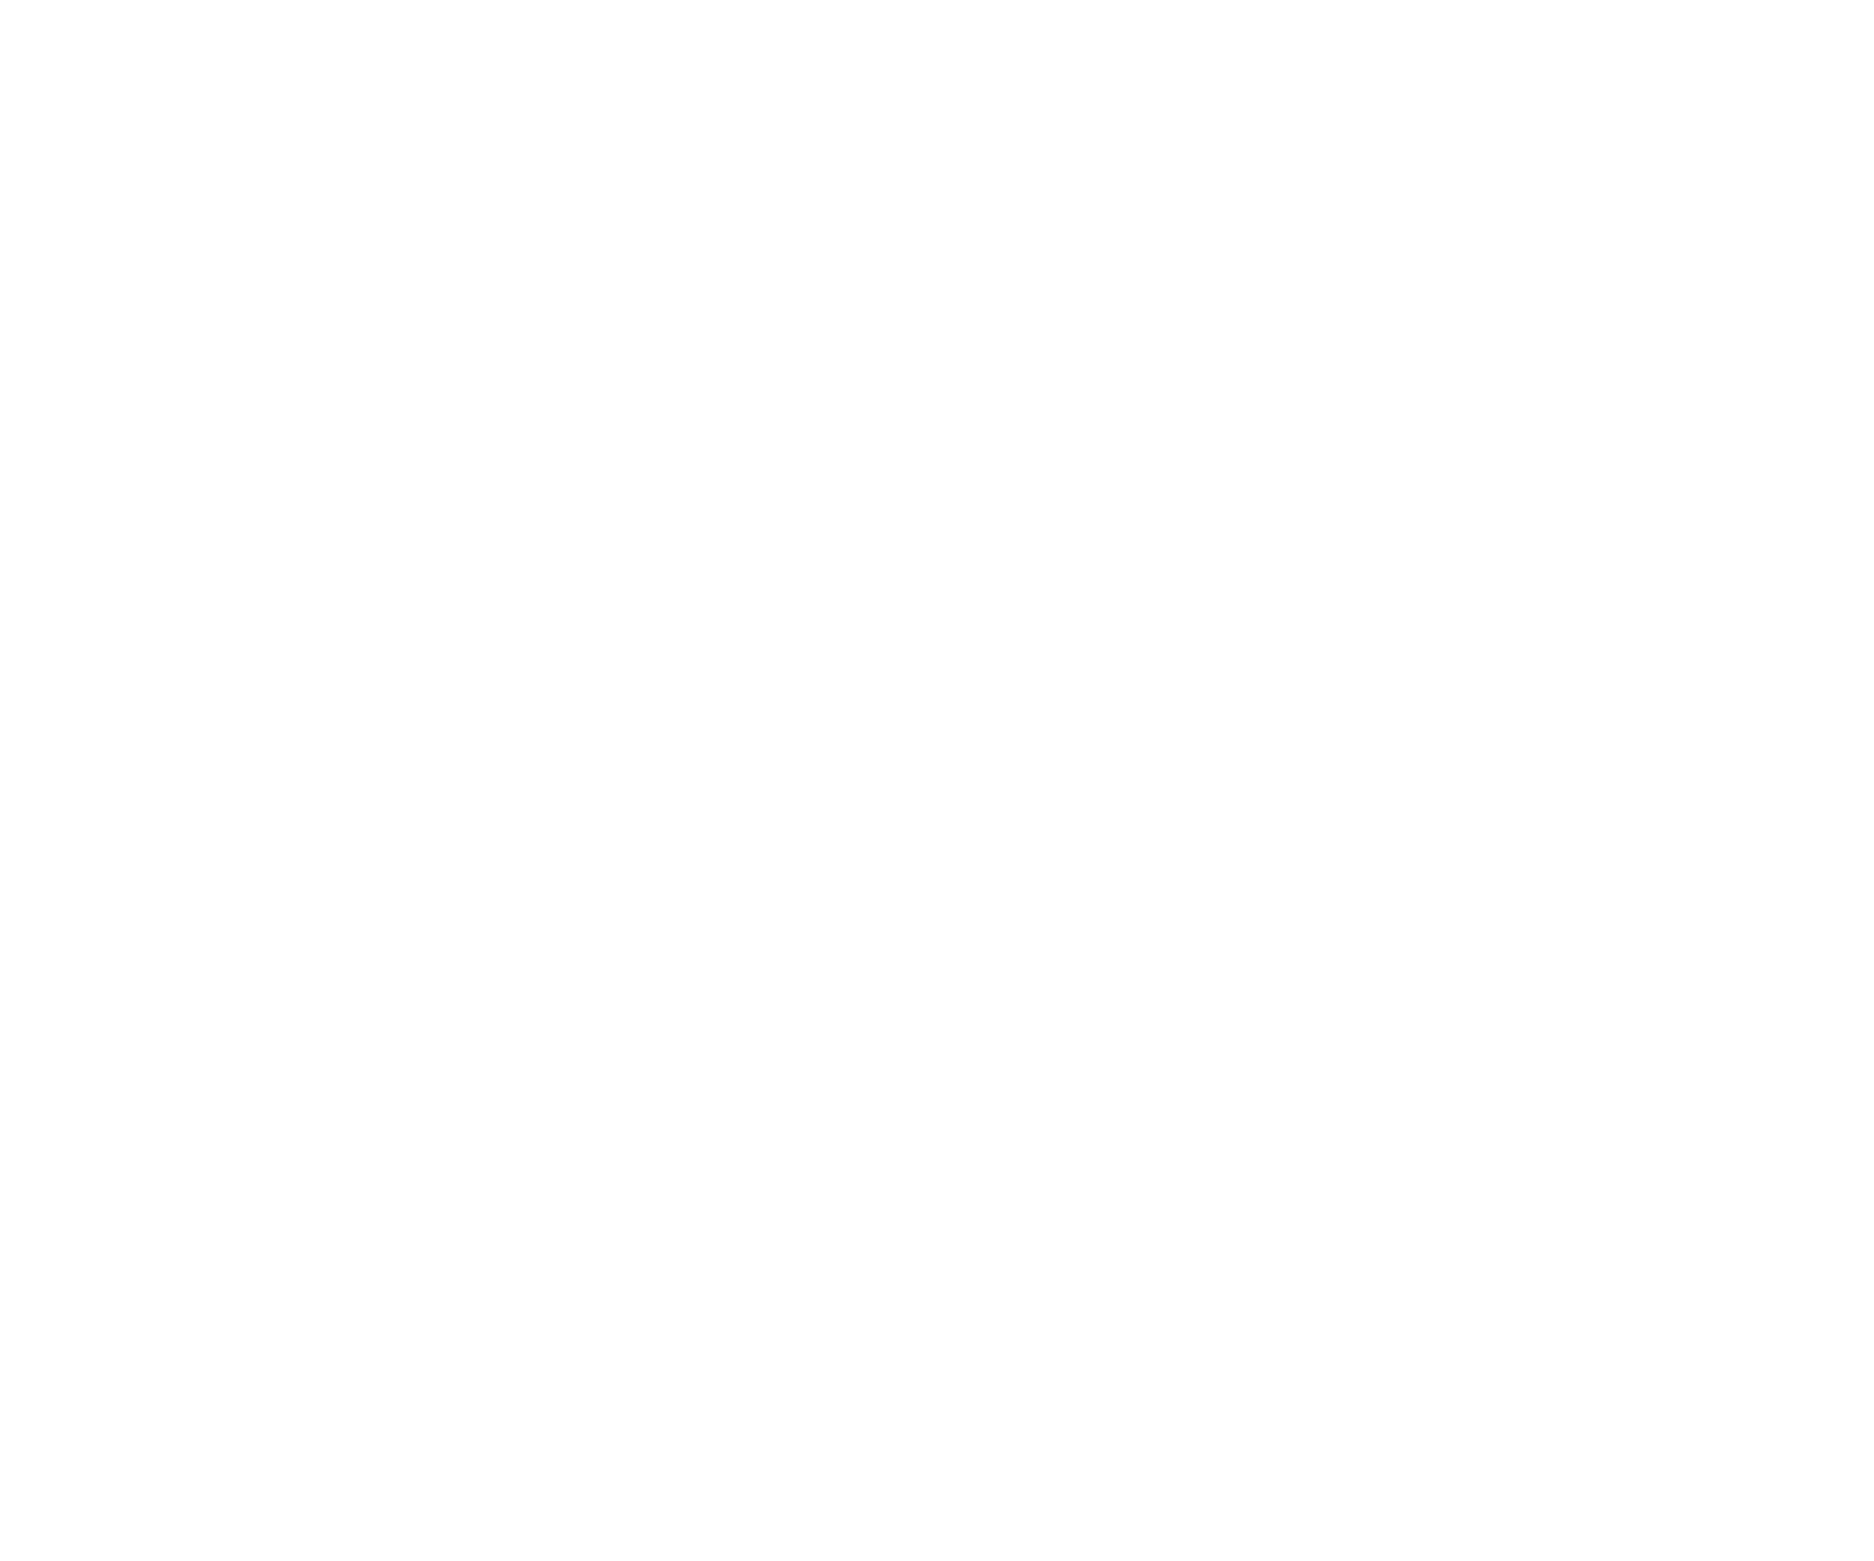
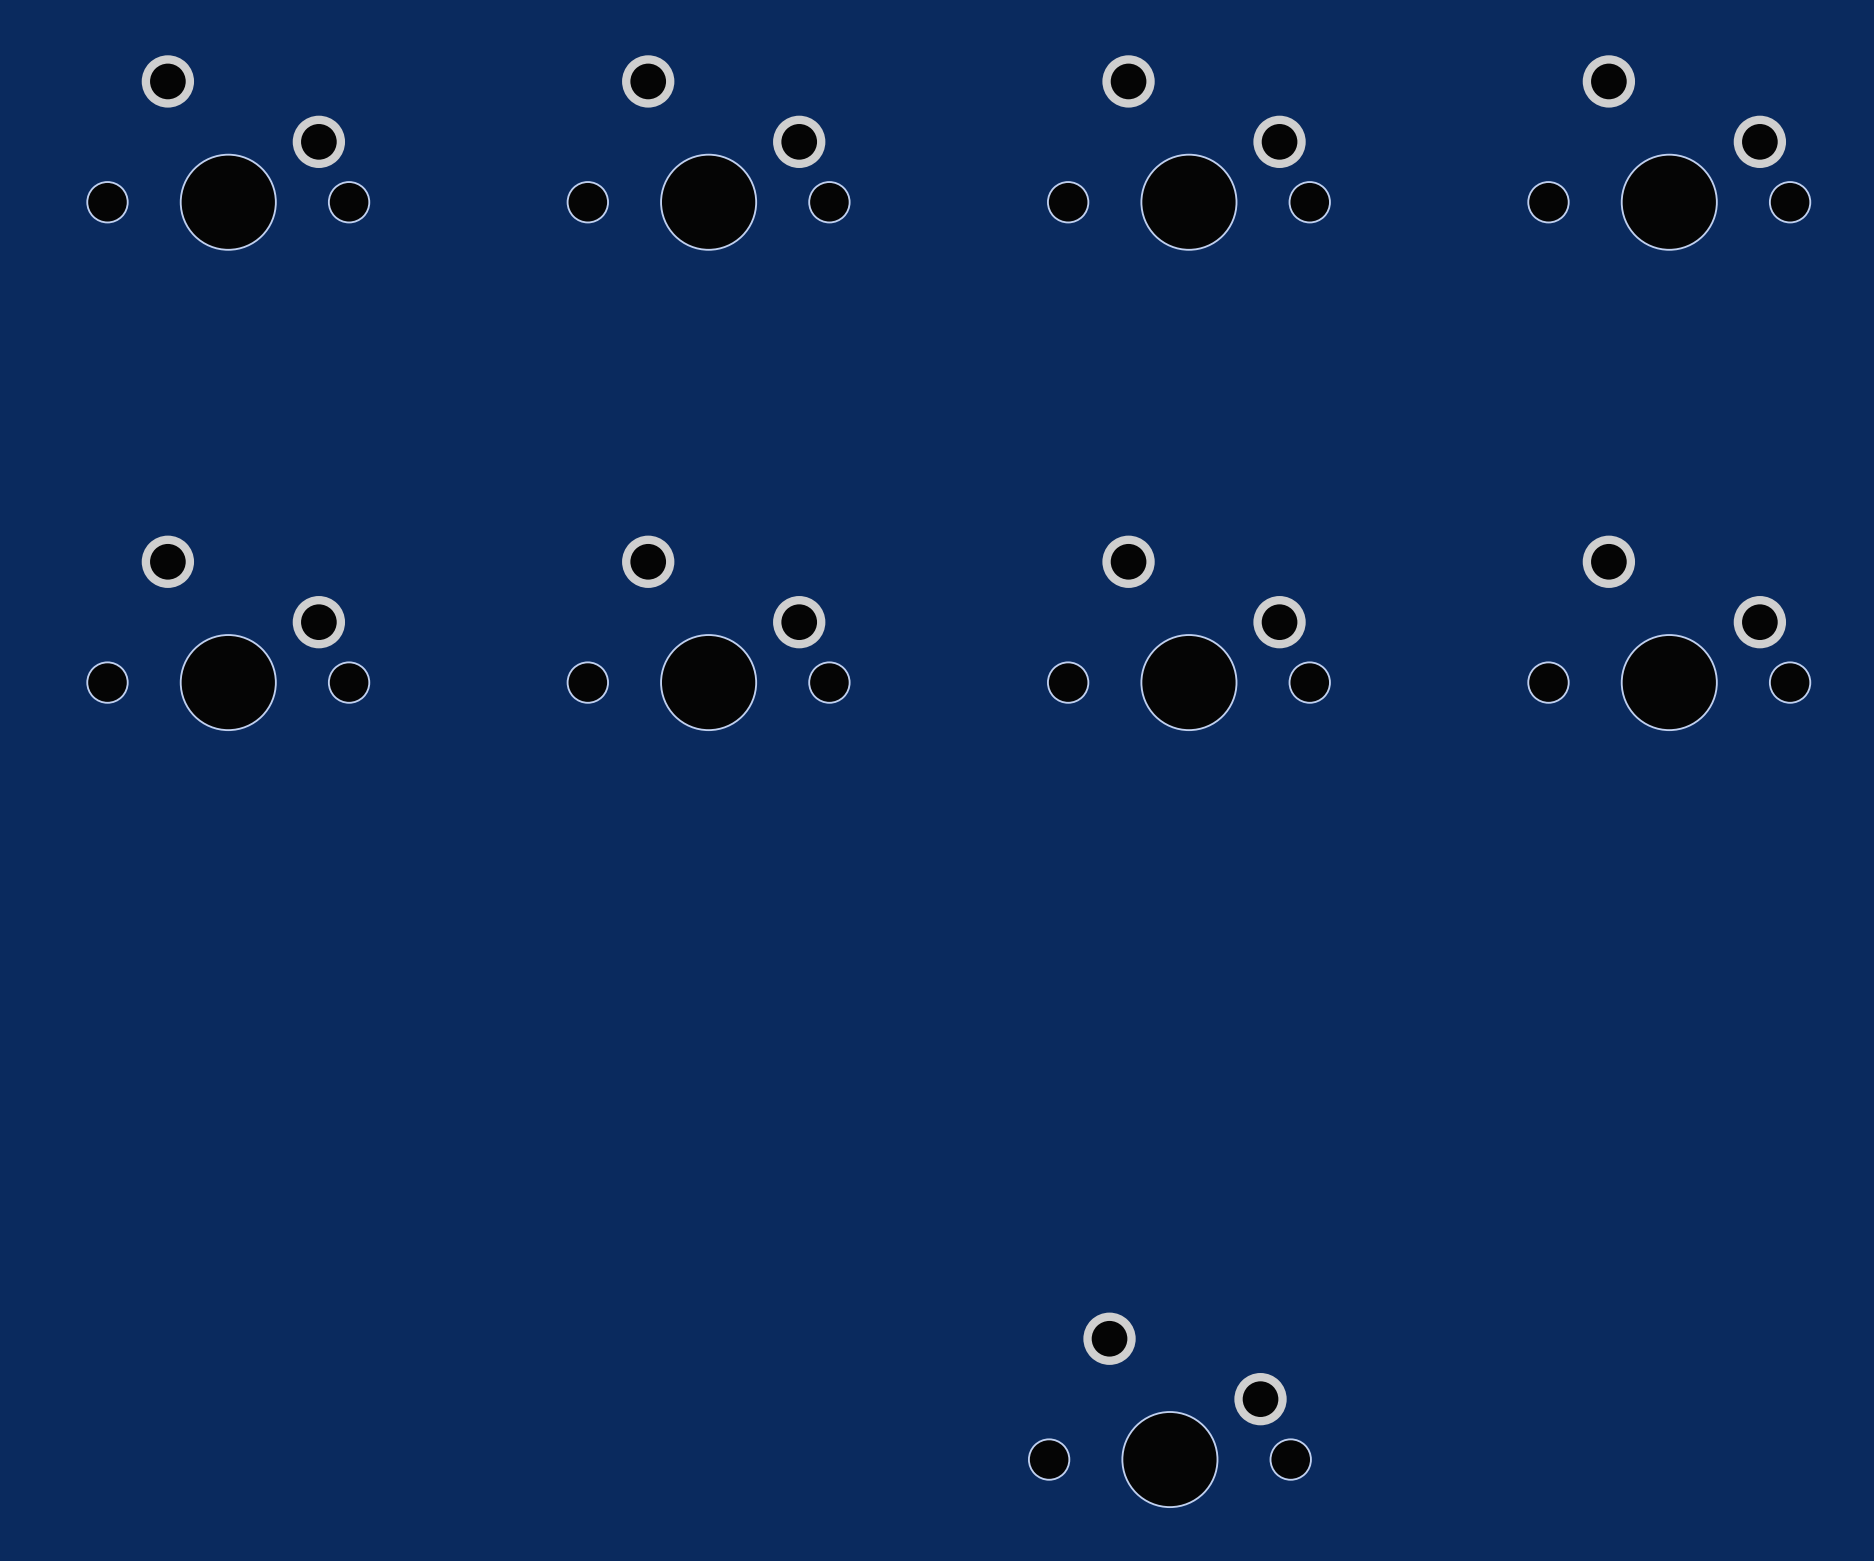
part: none -> (228, 152)
part: none -> (708, 152)
part: none -> (1188, 152)
part: none -> (1669, 152)
part: none -> (228, 632)
part: none -> (708, 632)
part: none -> (1188, 632)
part: none -> (1669, 632)
part: none -> (1169, 1409)

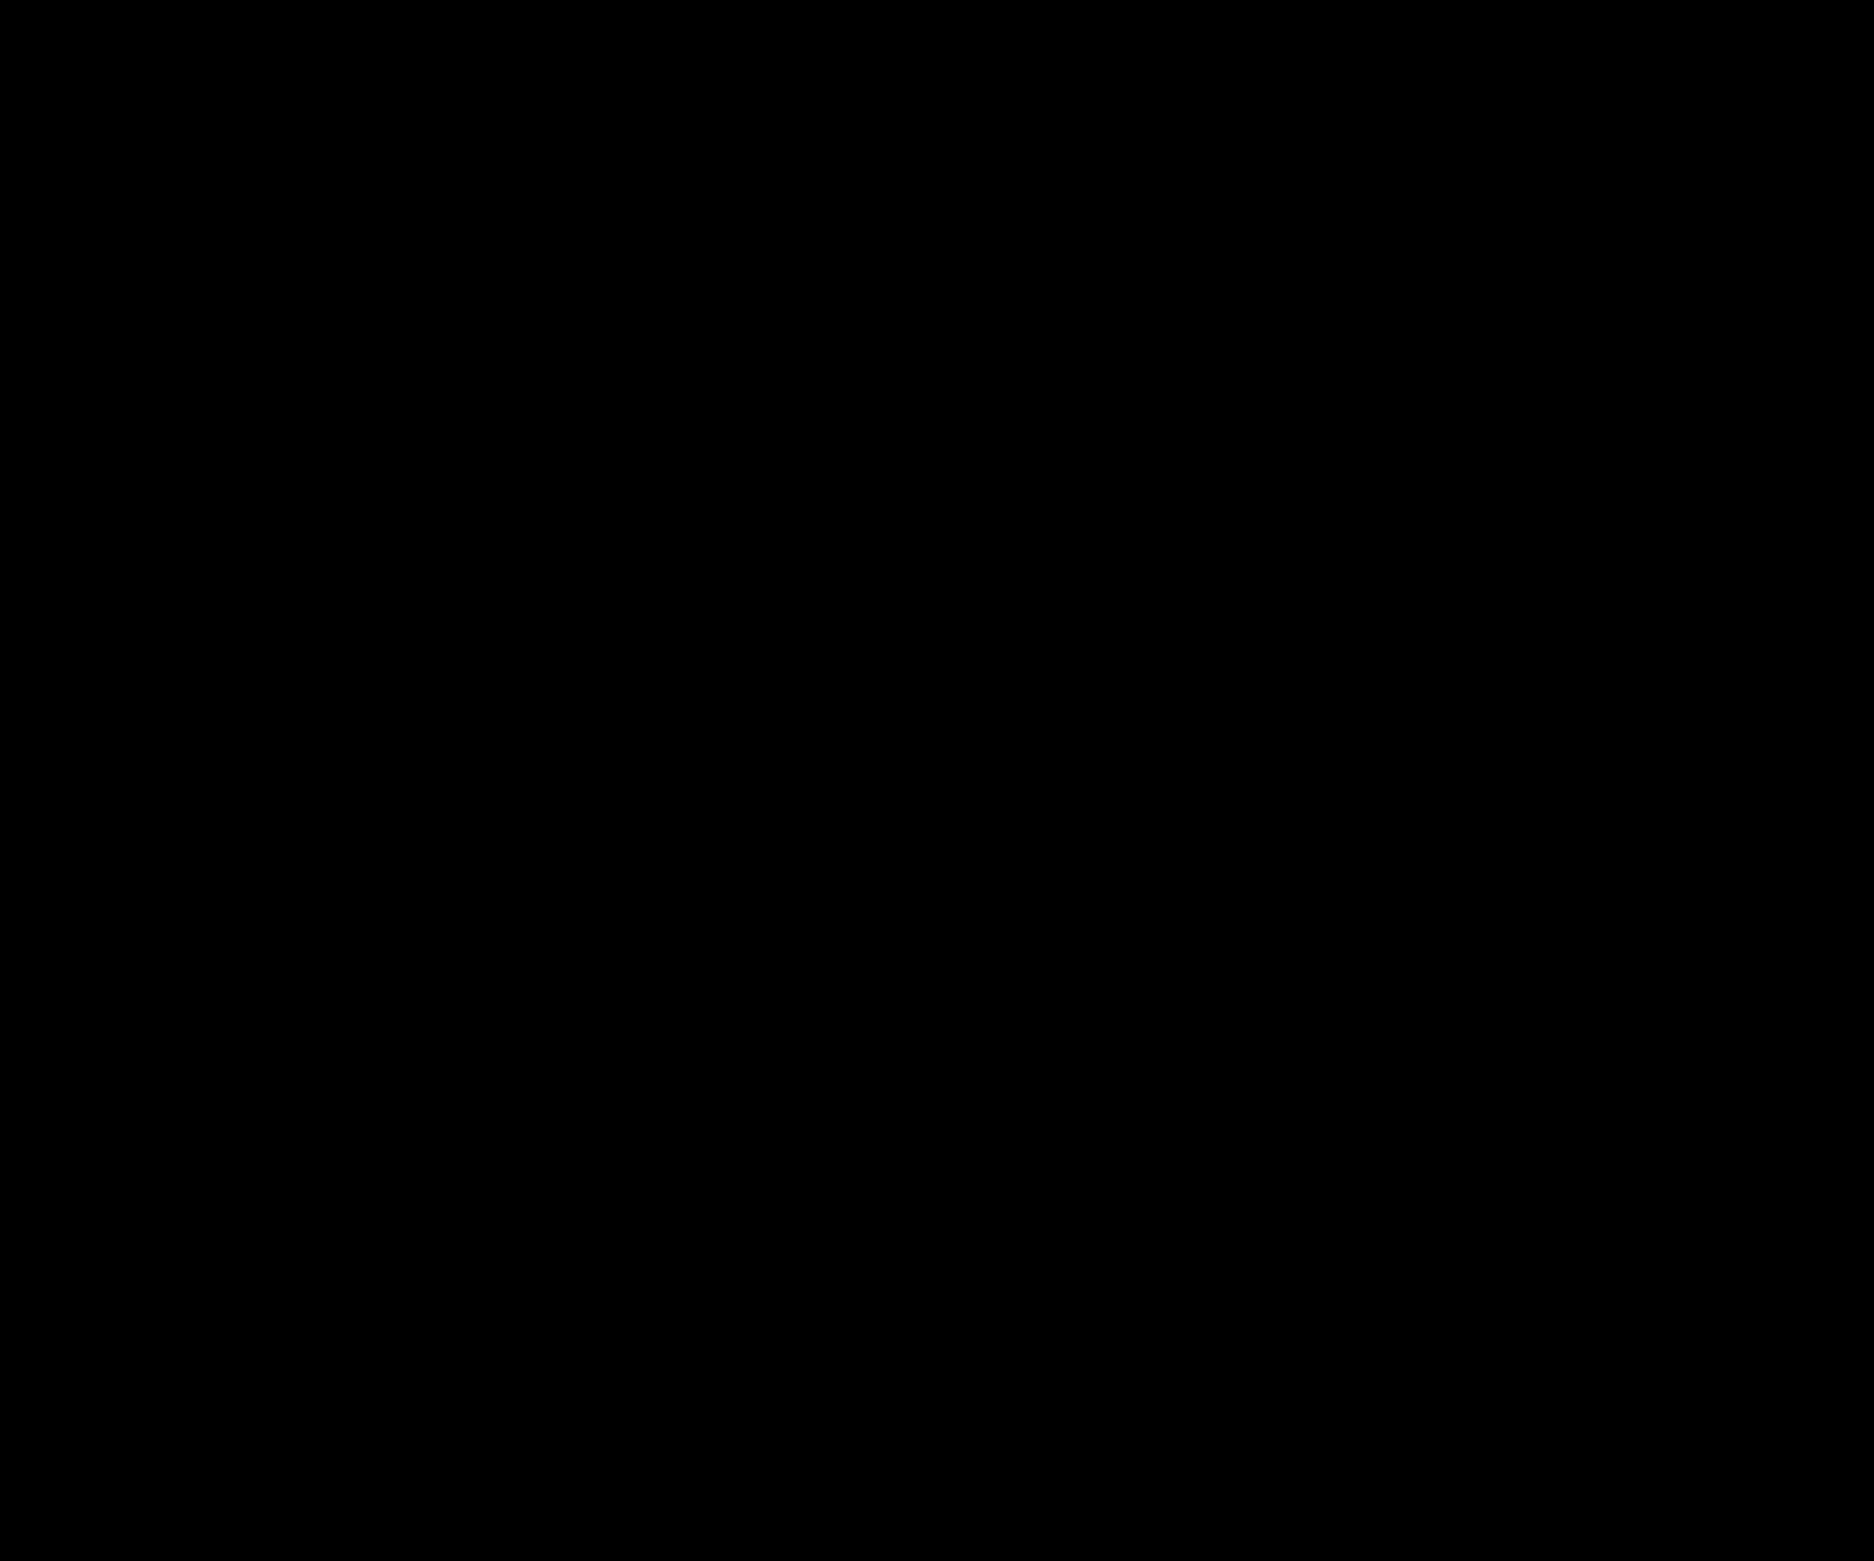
part: (228, 152) -> none
part: (708, 152) -> none
part: (1188, 152) -> none
part: (1669, 152) -> none
part: (228, 632) -> none
part: (708, 632) -> none
part: (1188, 632) -> none
part: (1669, 632) -> none
part: (1169, 1409) -> none

